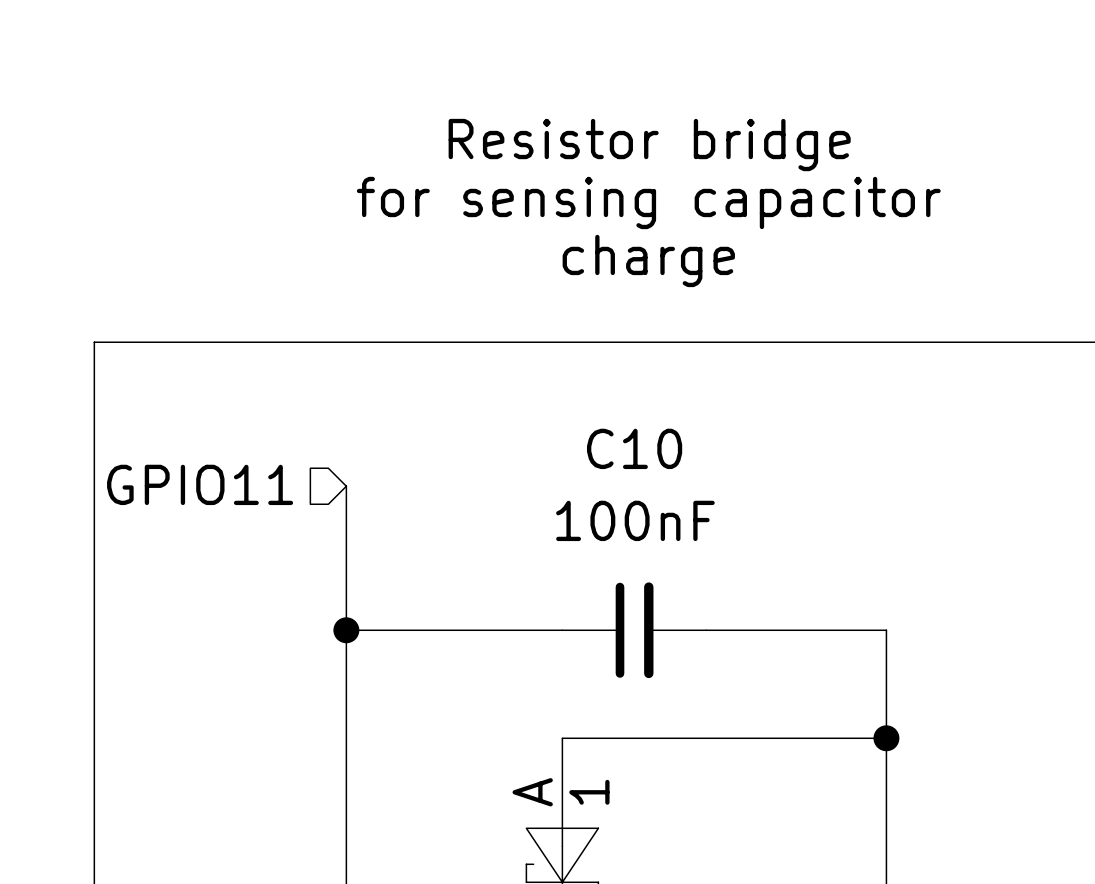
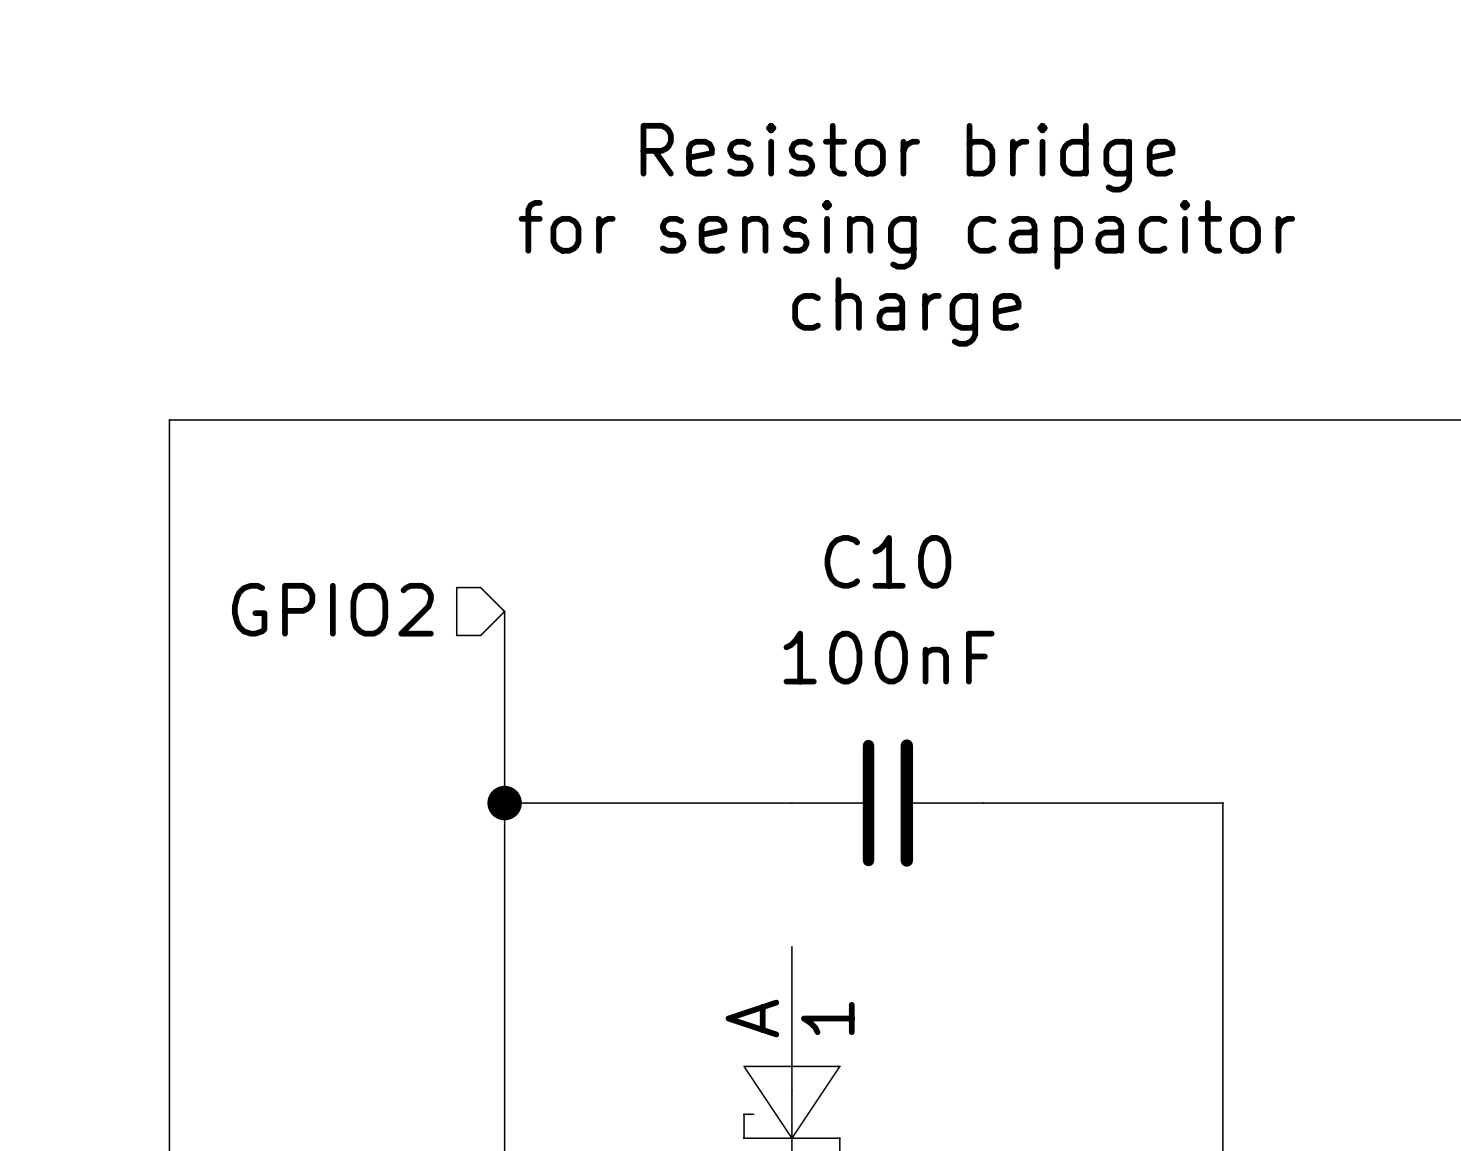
hierarchical label: GPIO11 (200, 484) -> GPIO2 (332, 609)
wire: (562, 738) (886, 738) -> none
junction: (886, 738) -> none

